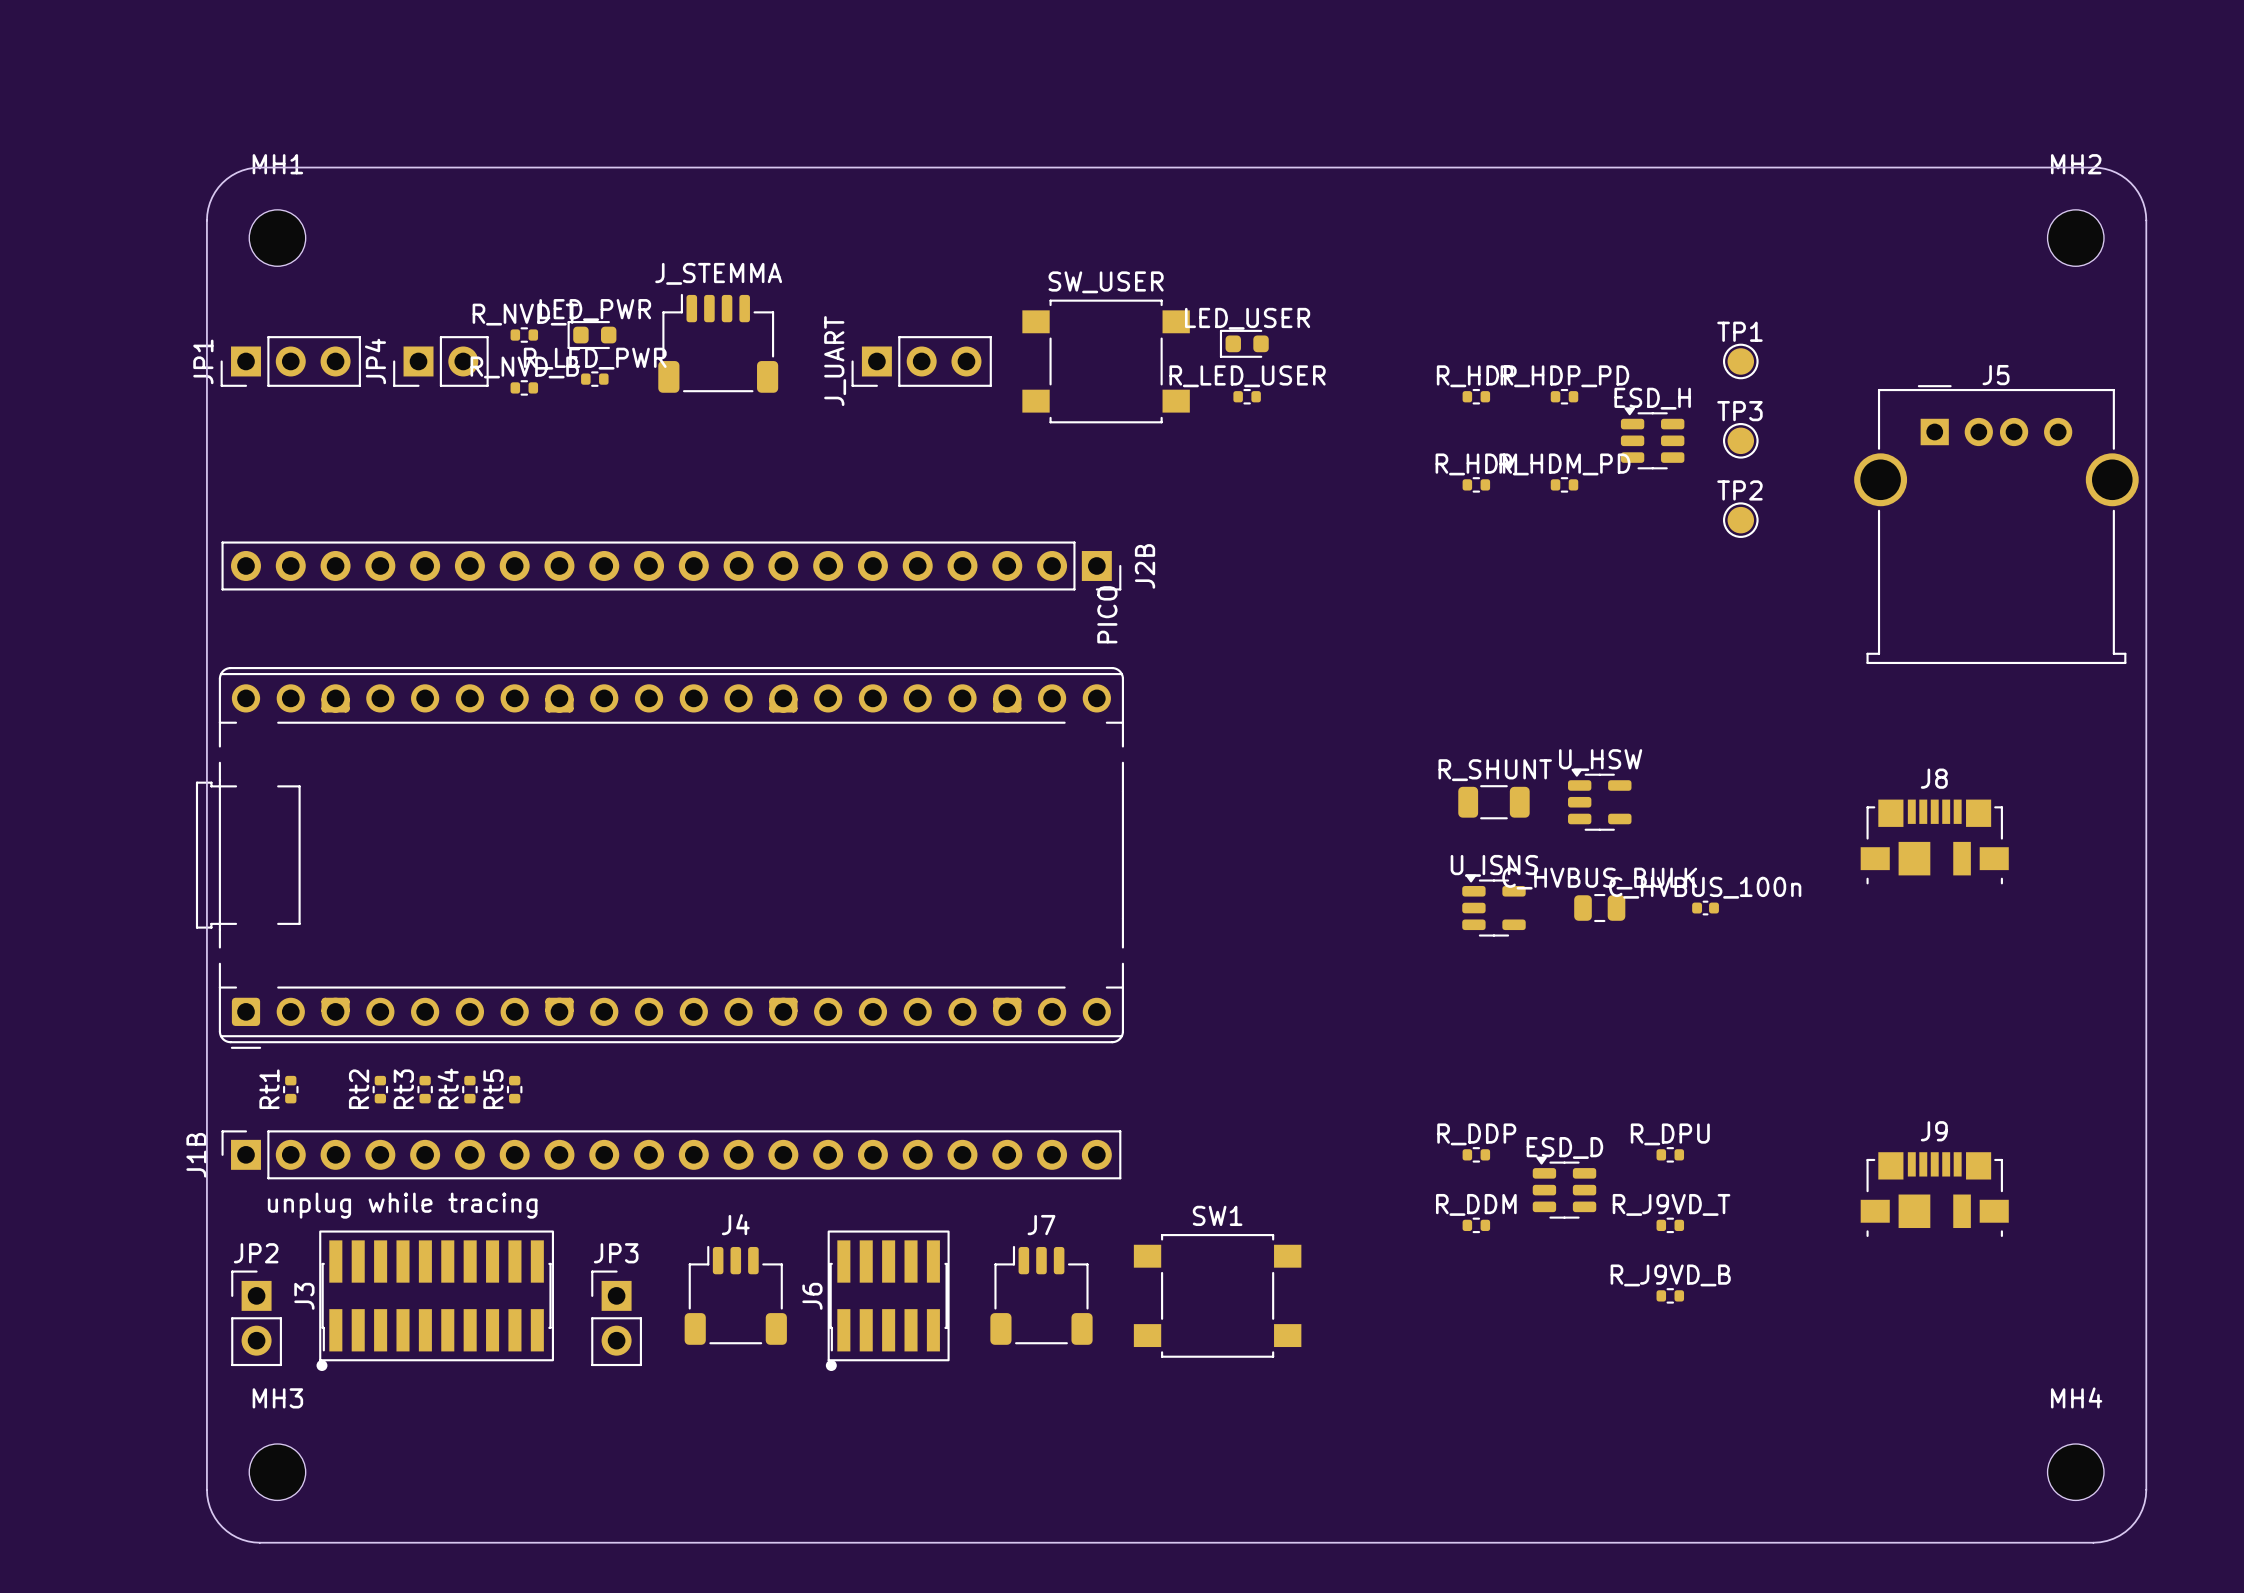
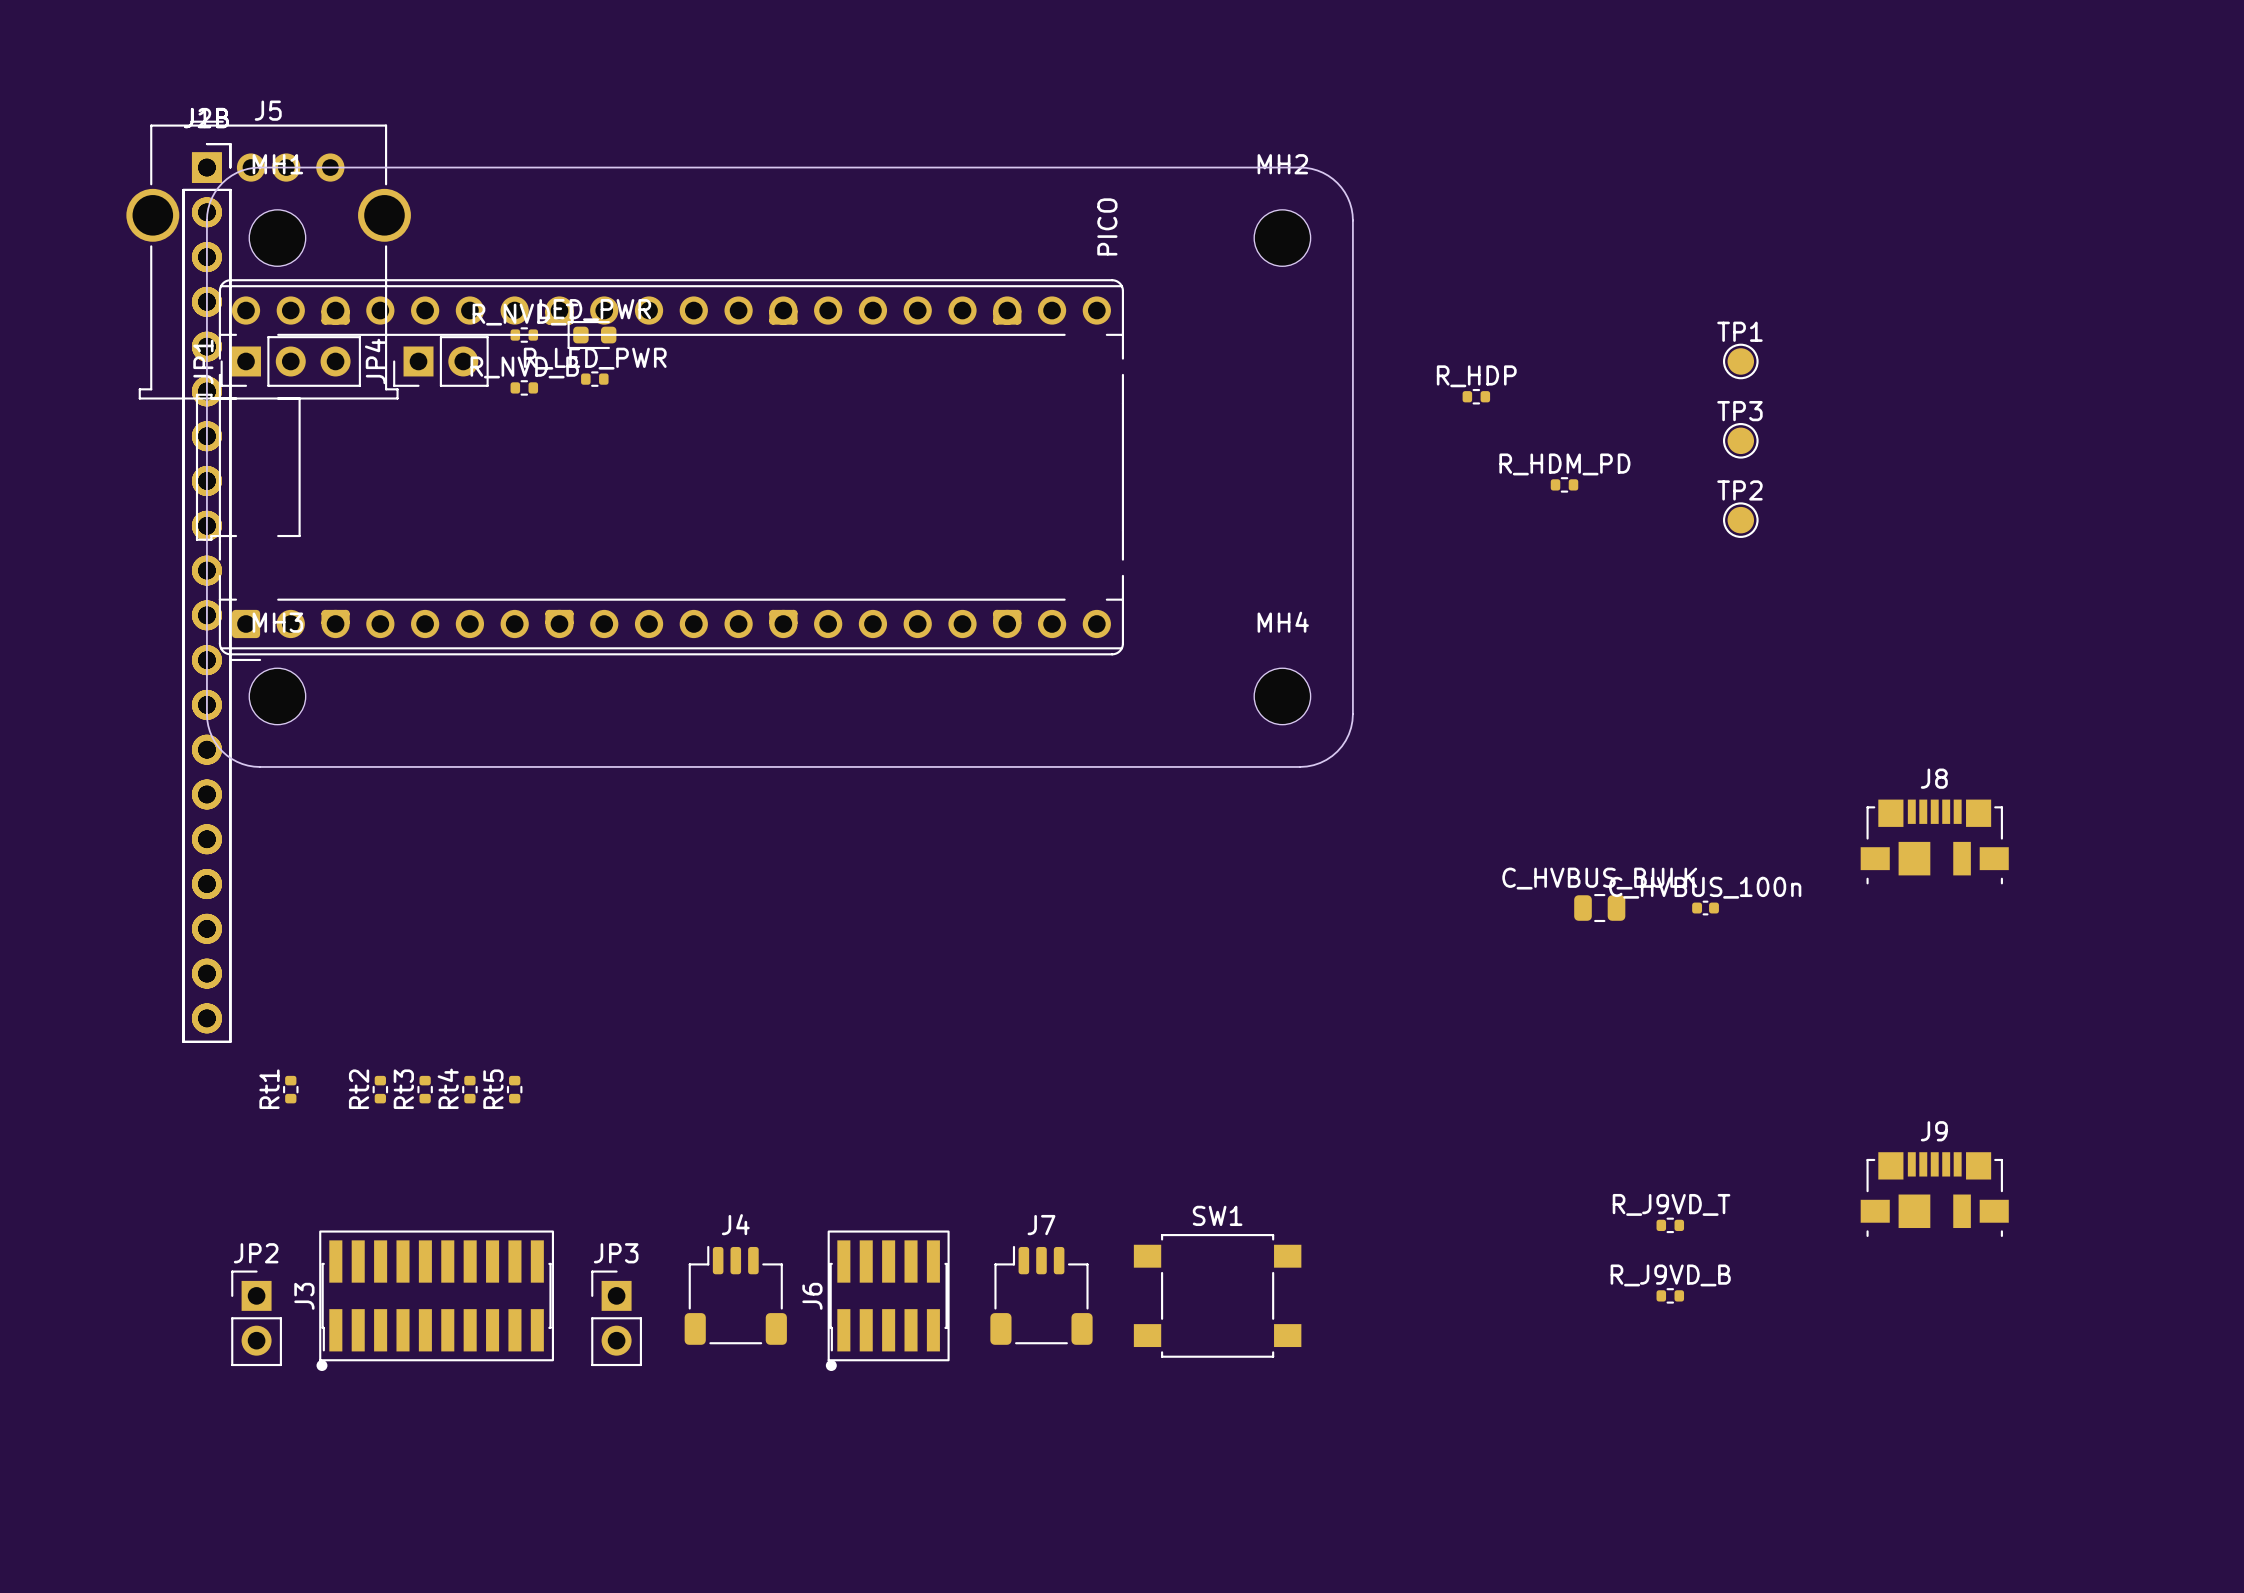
board edge: (1300, 167) (2093, 167) (2110, 170) (2121, 175) (2138, 192) (2143, 202) (2146, 220) (2146, 1489) (2144, 1503) (2139, 1516) (2130, 1527) (2119, 1535) (2107, 1540) (2093, 1542) (259, 1542) (236, 1537) (226, 1531) (215, 1517) (208, 1501) (206, 1489) (206, 714) -> (1300, 167) (1317, 170) (1337, 183) (1349, 202) (1352, 220) (1352, 714) (1351, 727) (1345, 740) (1337, 751) (1326, 759) (1313, 765) (1300, 766) (259, 766) (236, 761) (222, 751) (209, 731) (206, 714)
MH2 position: (2075, 238) -> (1282, 238)
J_STEMMA: (718, 343) -> none
LED_USER: (1244, 343) -> none
J_UART: (921, 361) -> none
SW_USER: (1106, 361) -> none
R_LED_USER: (1247, 396) -> none
R_HDP_PD: (1564, 396) -> none
ESD_H: (1652, 438) -> none
R_HDM: (1476, 484) -> none
J5 position: (1996, 524) -> (268, 260)
J2B rotation: 0° (671, 565) -> 90° counterclockwise (206, 592)
U_HSW: (1599, 799) -> none
R_SHUNT: (1493, 802) -> none
PICO position: (659, 857) -> (659, 470)
U_ISNS: (1493, 905) -> none
J1B rotation: 0° (671, 1154) -> 90° clockwise (206, 592)
J1B position: (671, 1154) -> (206, 592)
R_DDP: (1476, 1154) -> none
R_DPU: (1670, 1154) -> none
ESD_D: (1564, 1187) -> none
text: unplug while tracing (402, 1205) -> none
R_DDM: (1476, 1225) -> none
MH3 position: (277, 1472) -> (277, 696)
MH4 position: (2075, 1472) -> (1282, 696)

